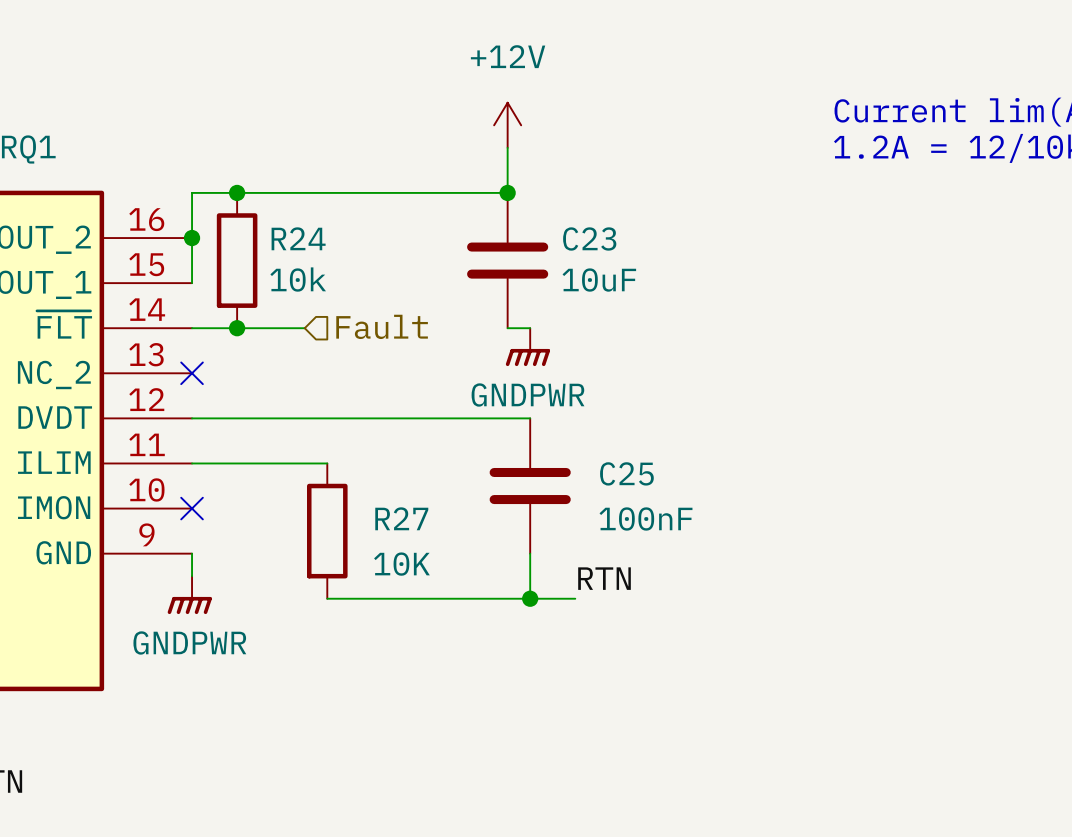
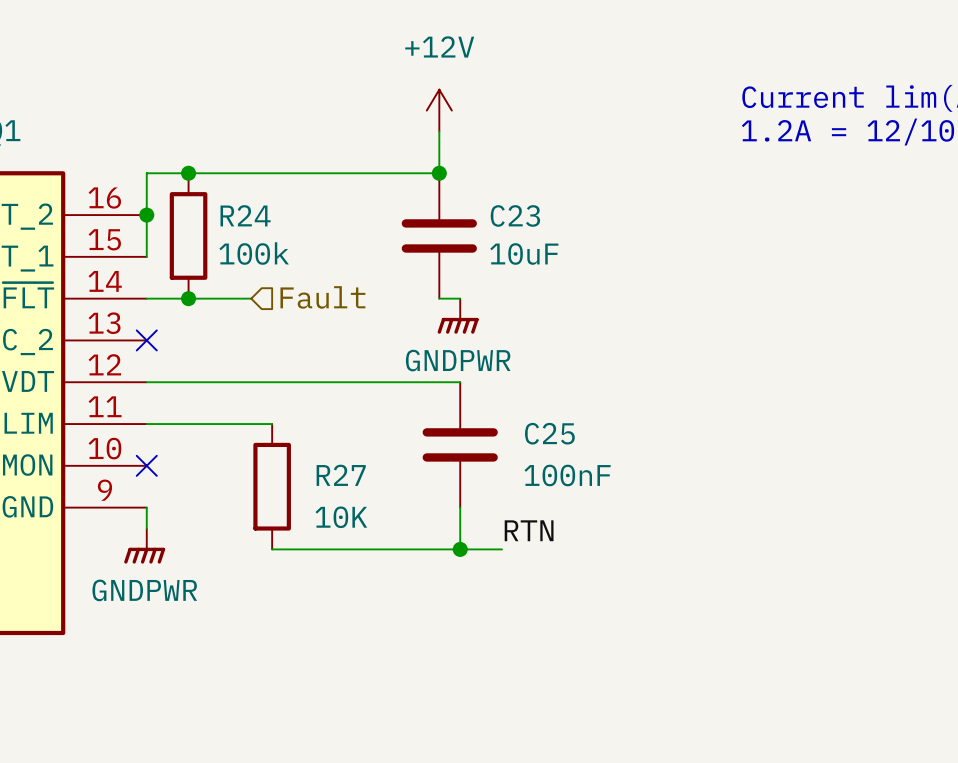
R24 value: 10k (298, 279) -> 100k (254, 253)

